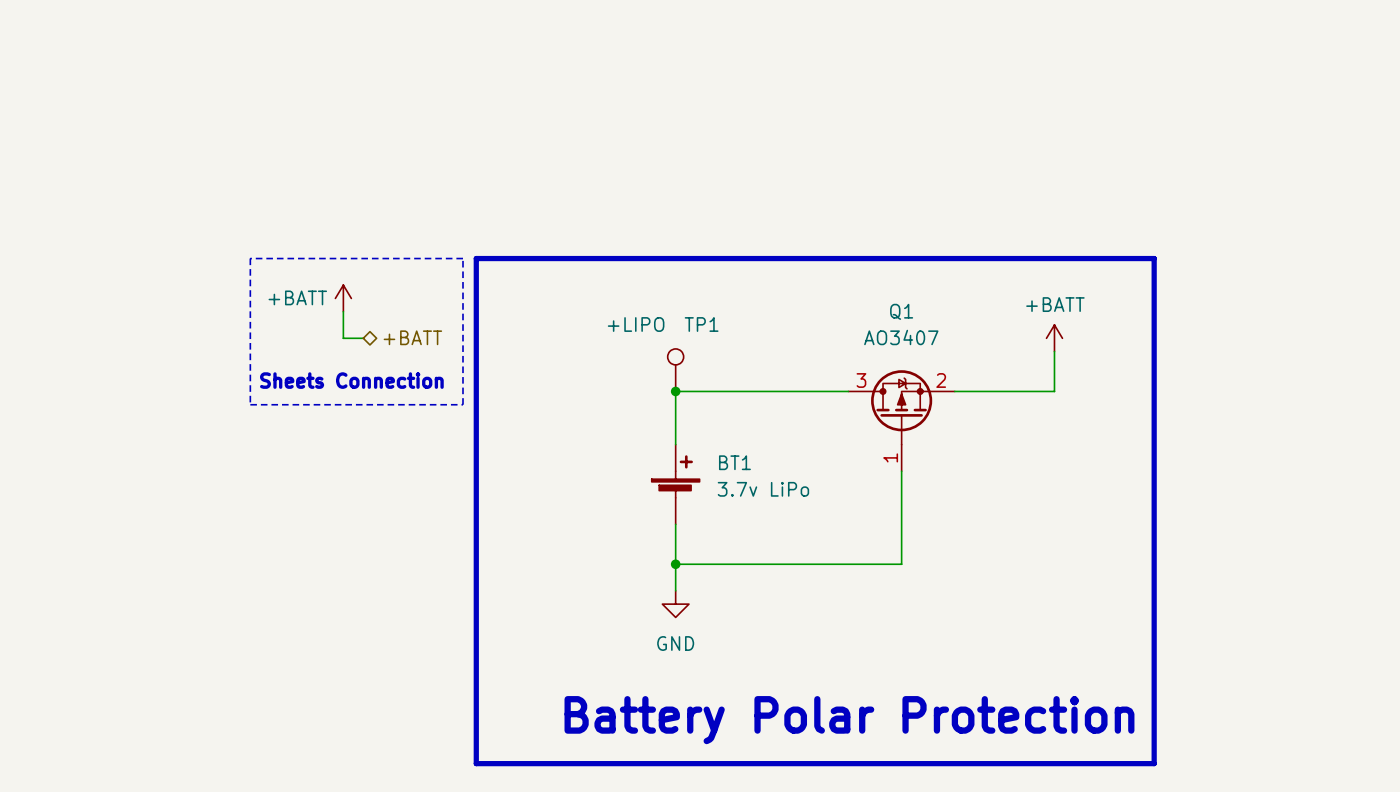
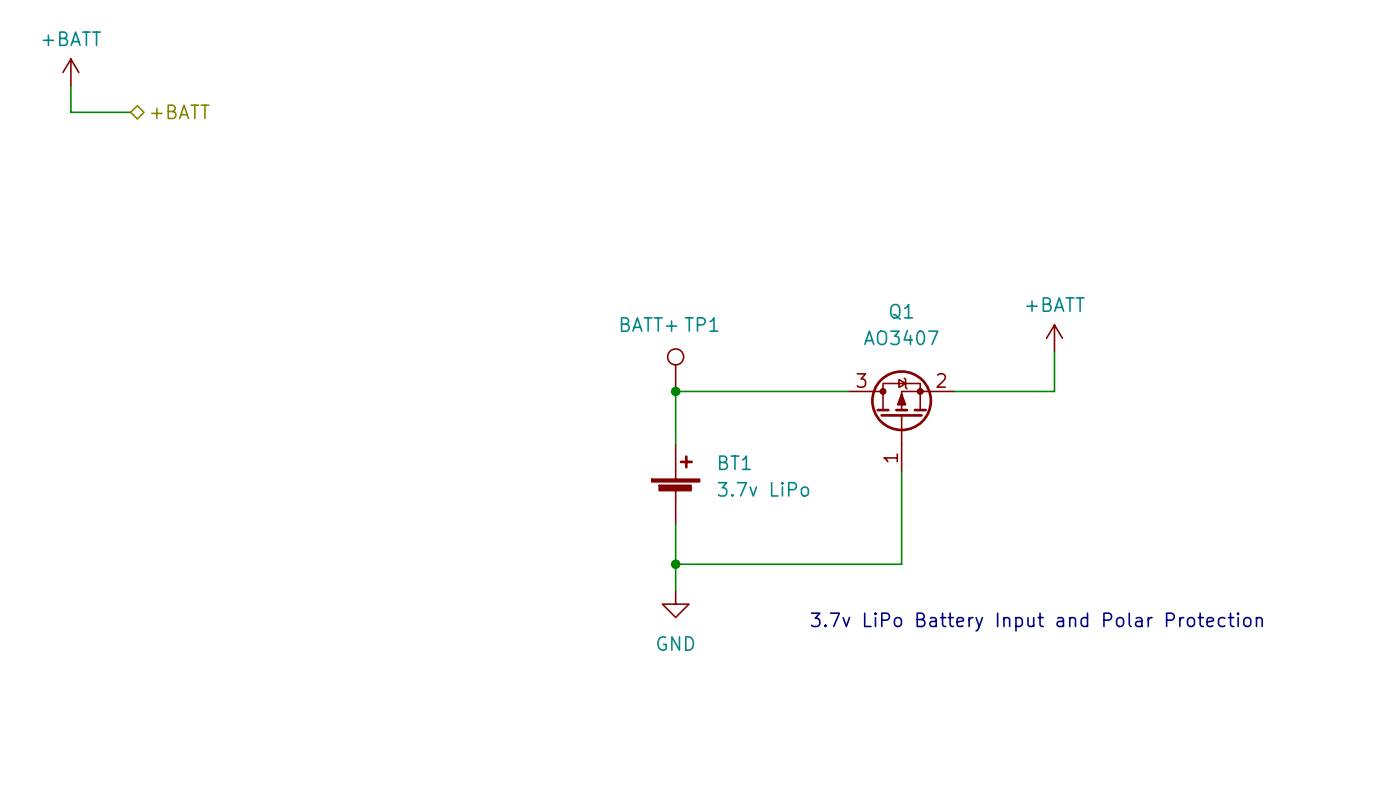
power symbol: none -> +BATT (70, 72)
wire: none -> (70, 85) (70, 112) (130, 112)
hierarchical label: none -> +BATT (180, 111)
line: (250, 258) (463, 258) (463, 404) (250, 404) (250, 258) -> none
line: (476, 258) (476, 763) (1154, 763) (1154, 258) (476, 258) -> none
power symbol: +BATT (343, 298) -> none
wire: (343, 311) (343, 338) (363, 338) -> none
TP1 value: +LIPO (636, 324) -> BATT+ (649, 324)
hierarchical label: +BATT (412, 337) -> none
text: Sheets Connection (351, 380) -> none
text: none -> 3.7v LiPo Battery Input and Polar Protection (1036, 622)
text: Battery Polar Protection (849, 720) -> none

